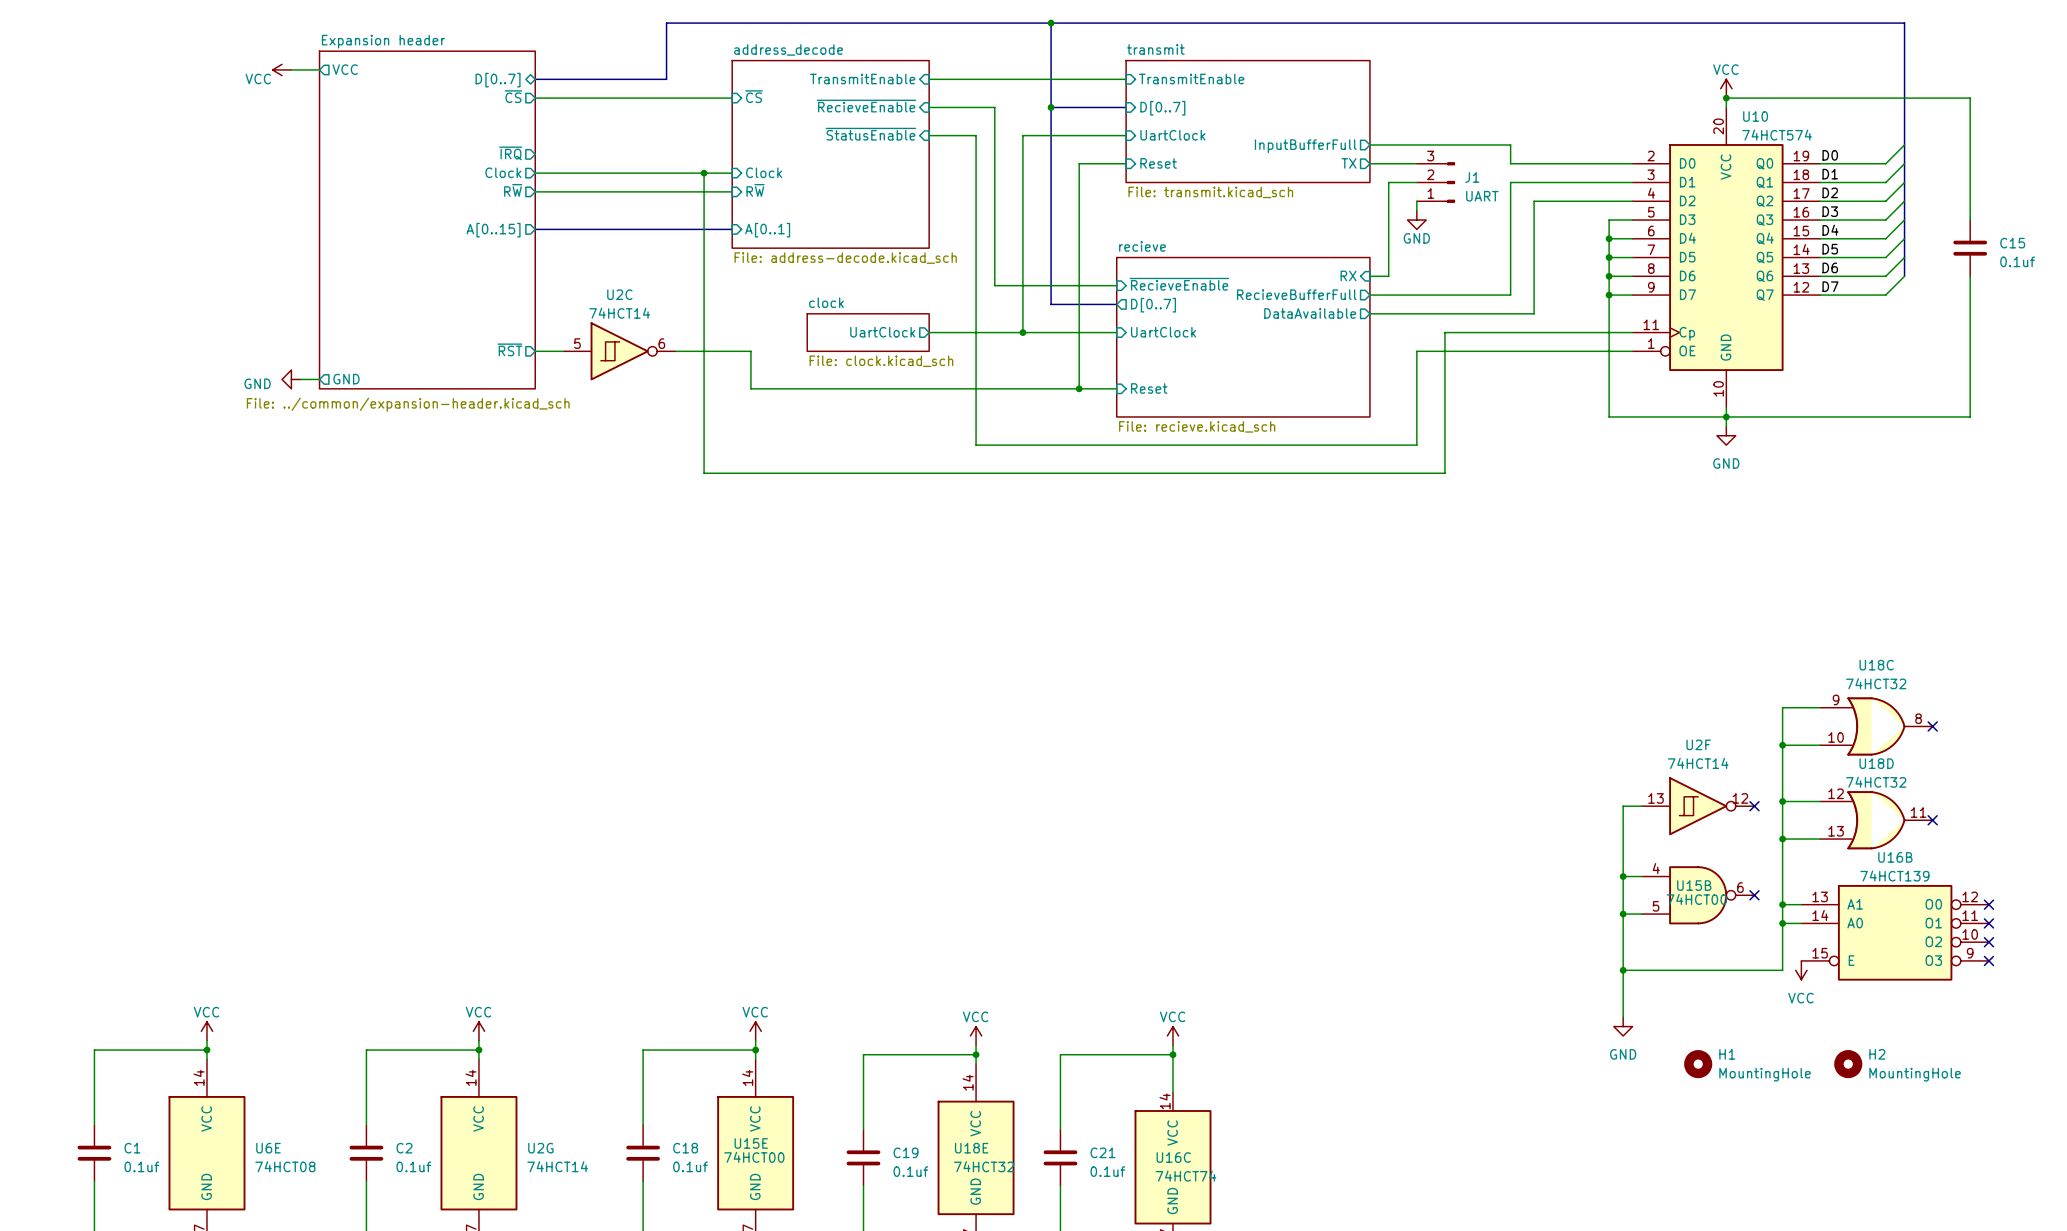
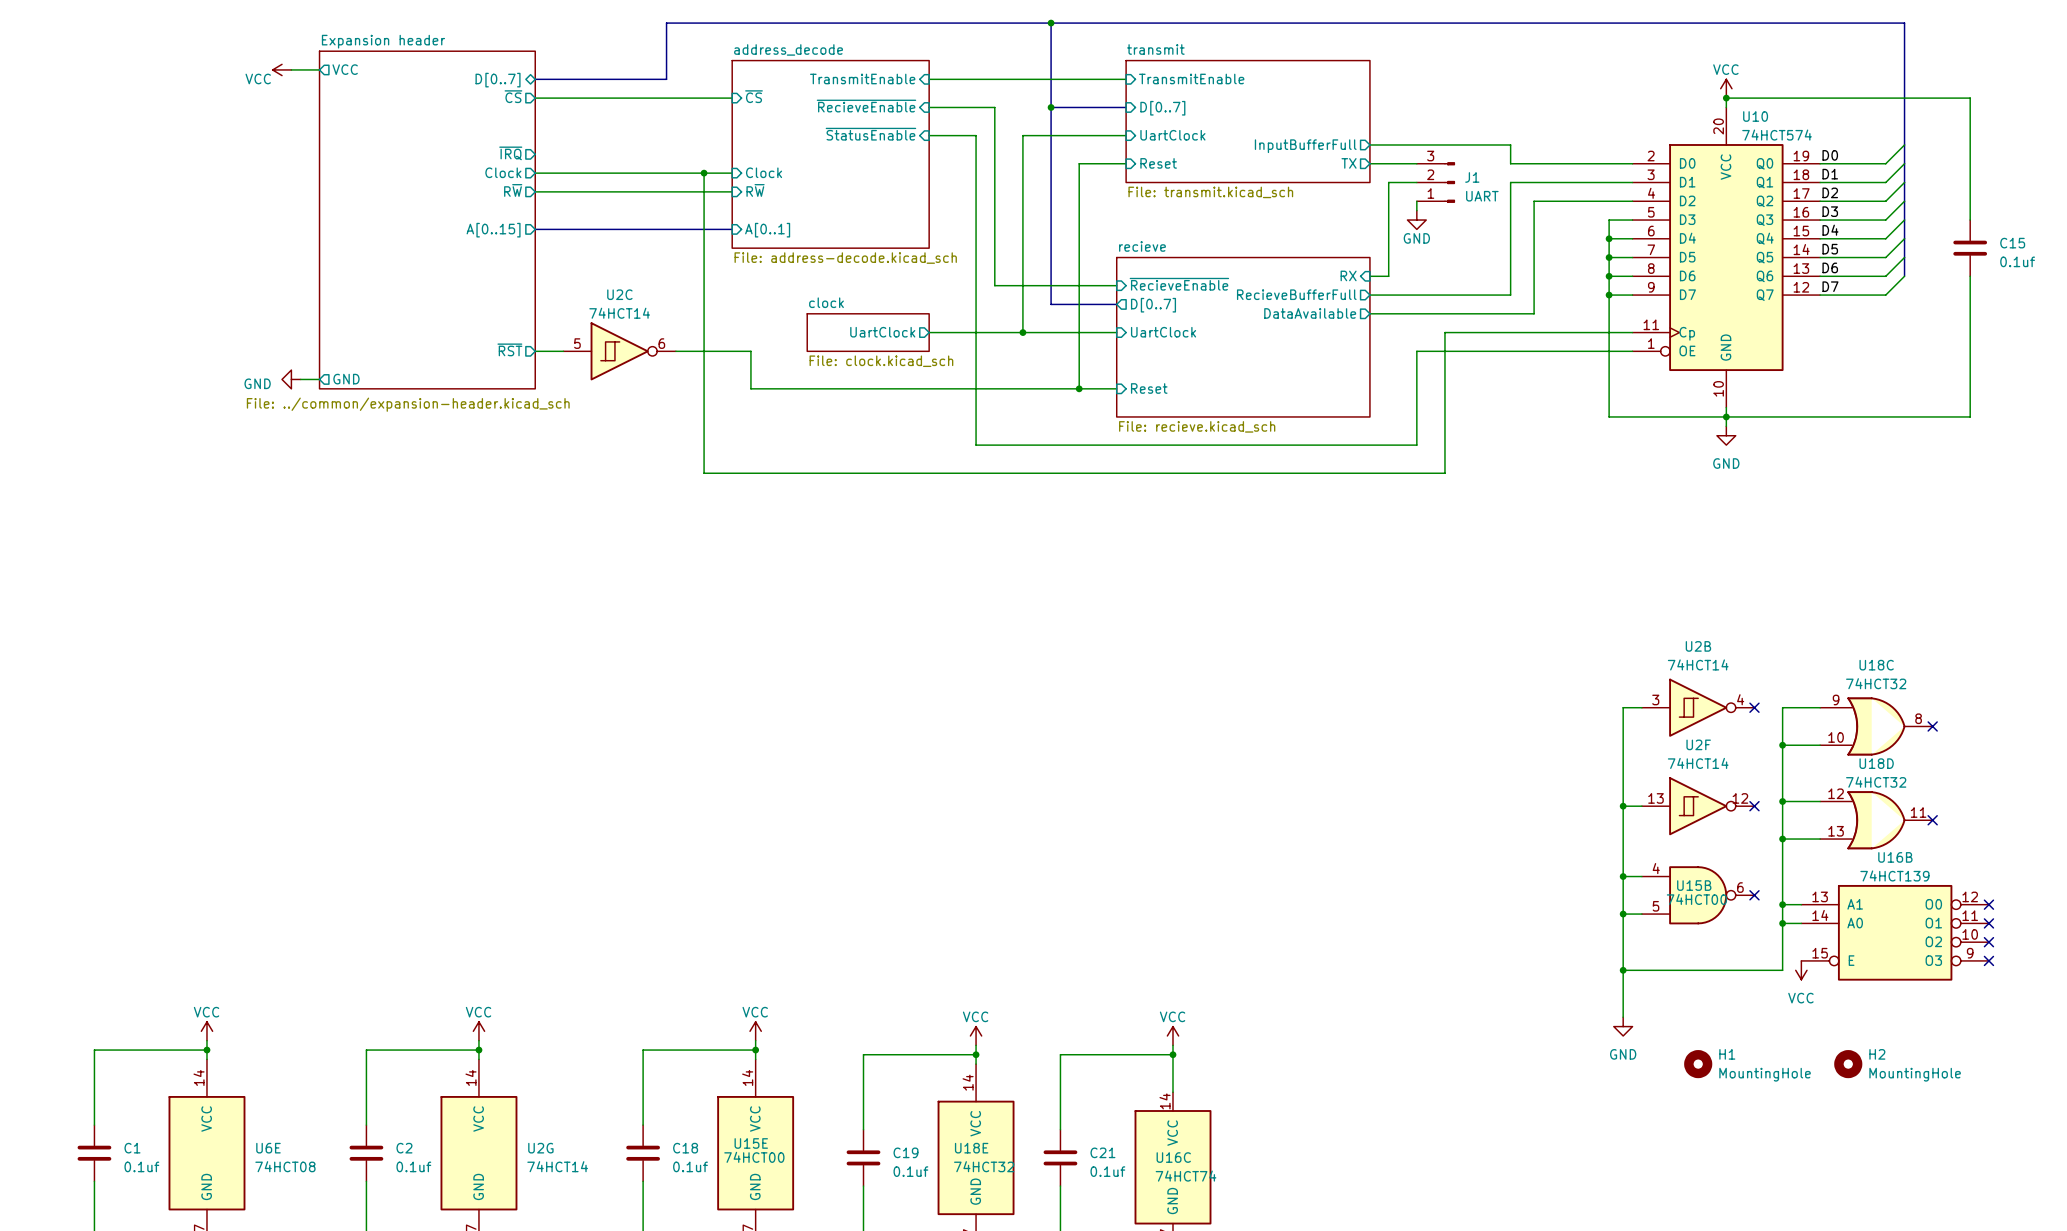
wire: none -> (1641, 707) (1623, 707) (1623, 806)
U2B: none -> 74HCT14 (1698, 707)
no-connect mark: none -> (1754, 707)
junction: none -> (1623, 806)

